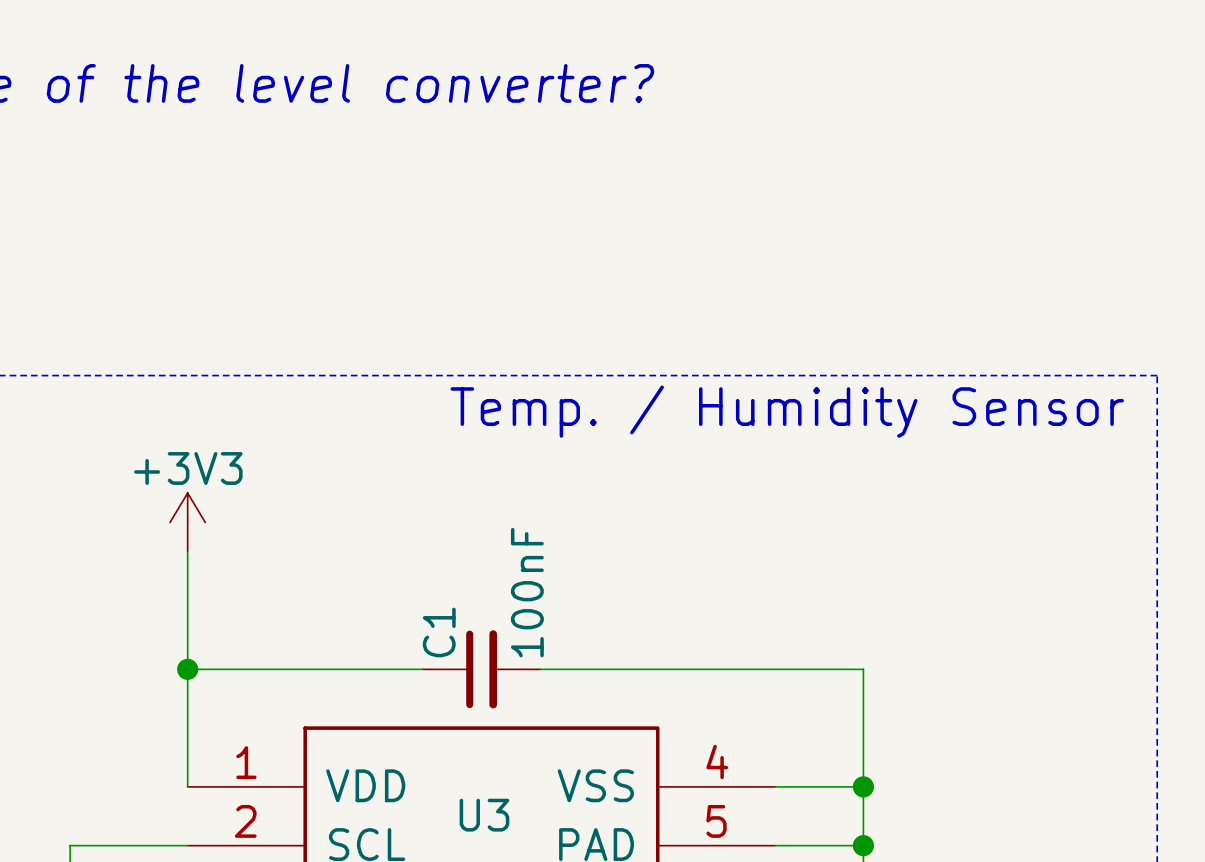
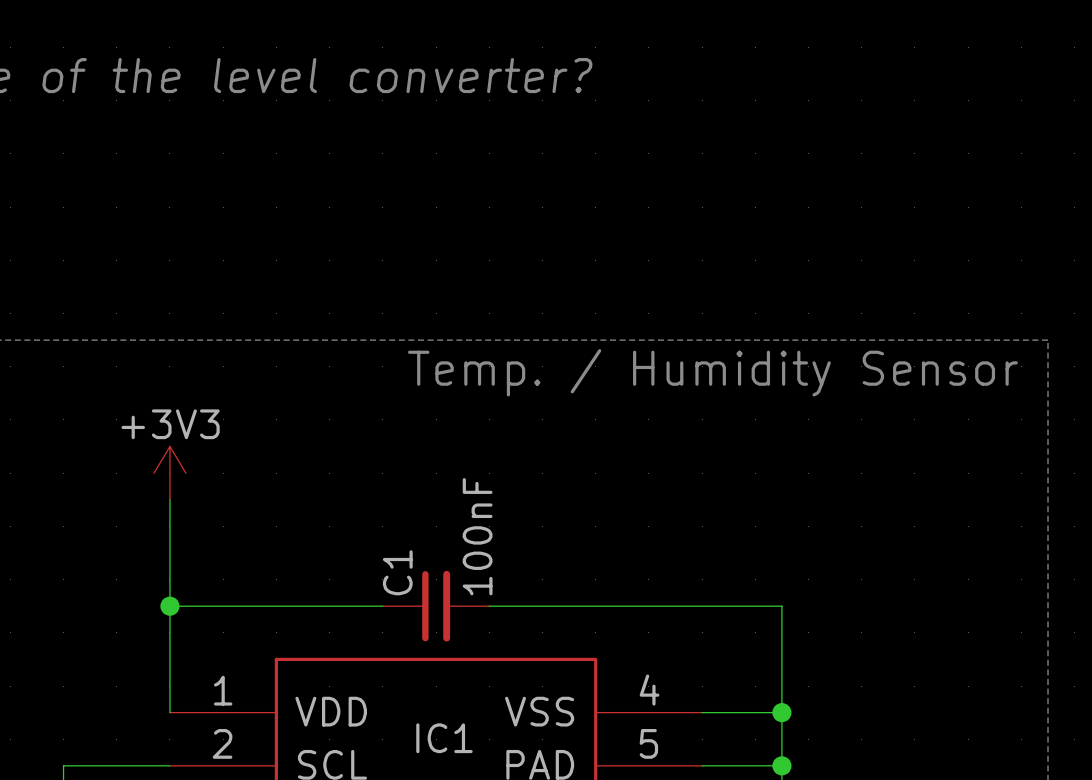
U3 name: U3 (484, 815) -> IC1 (444, 738)

